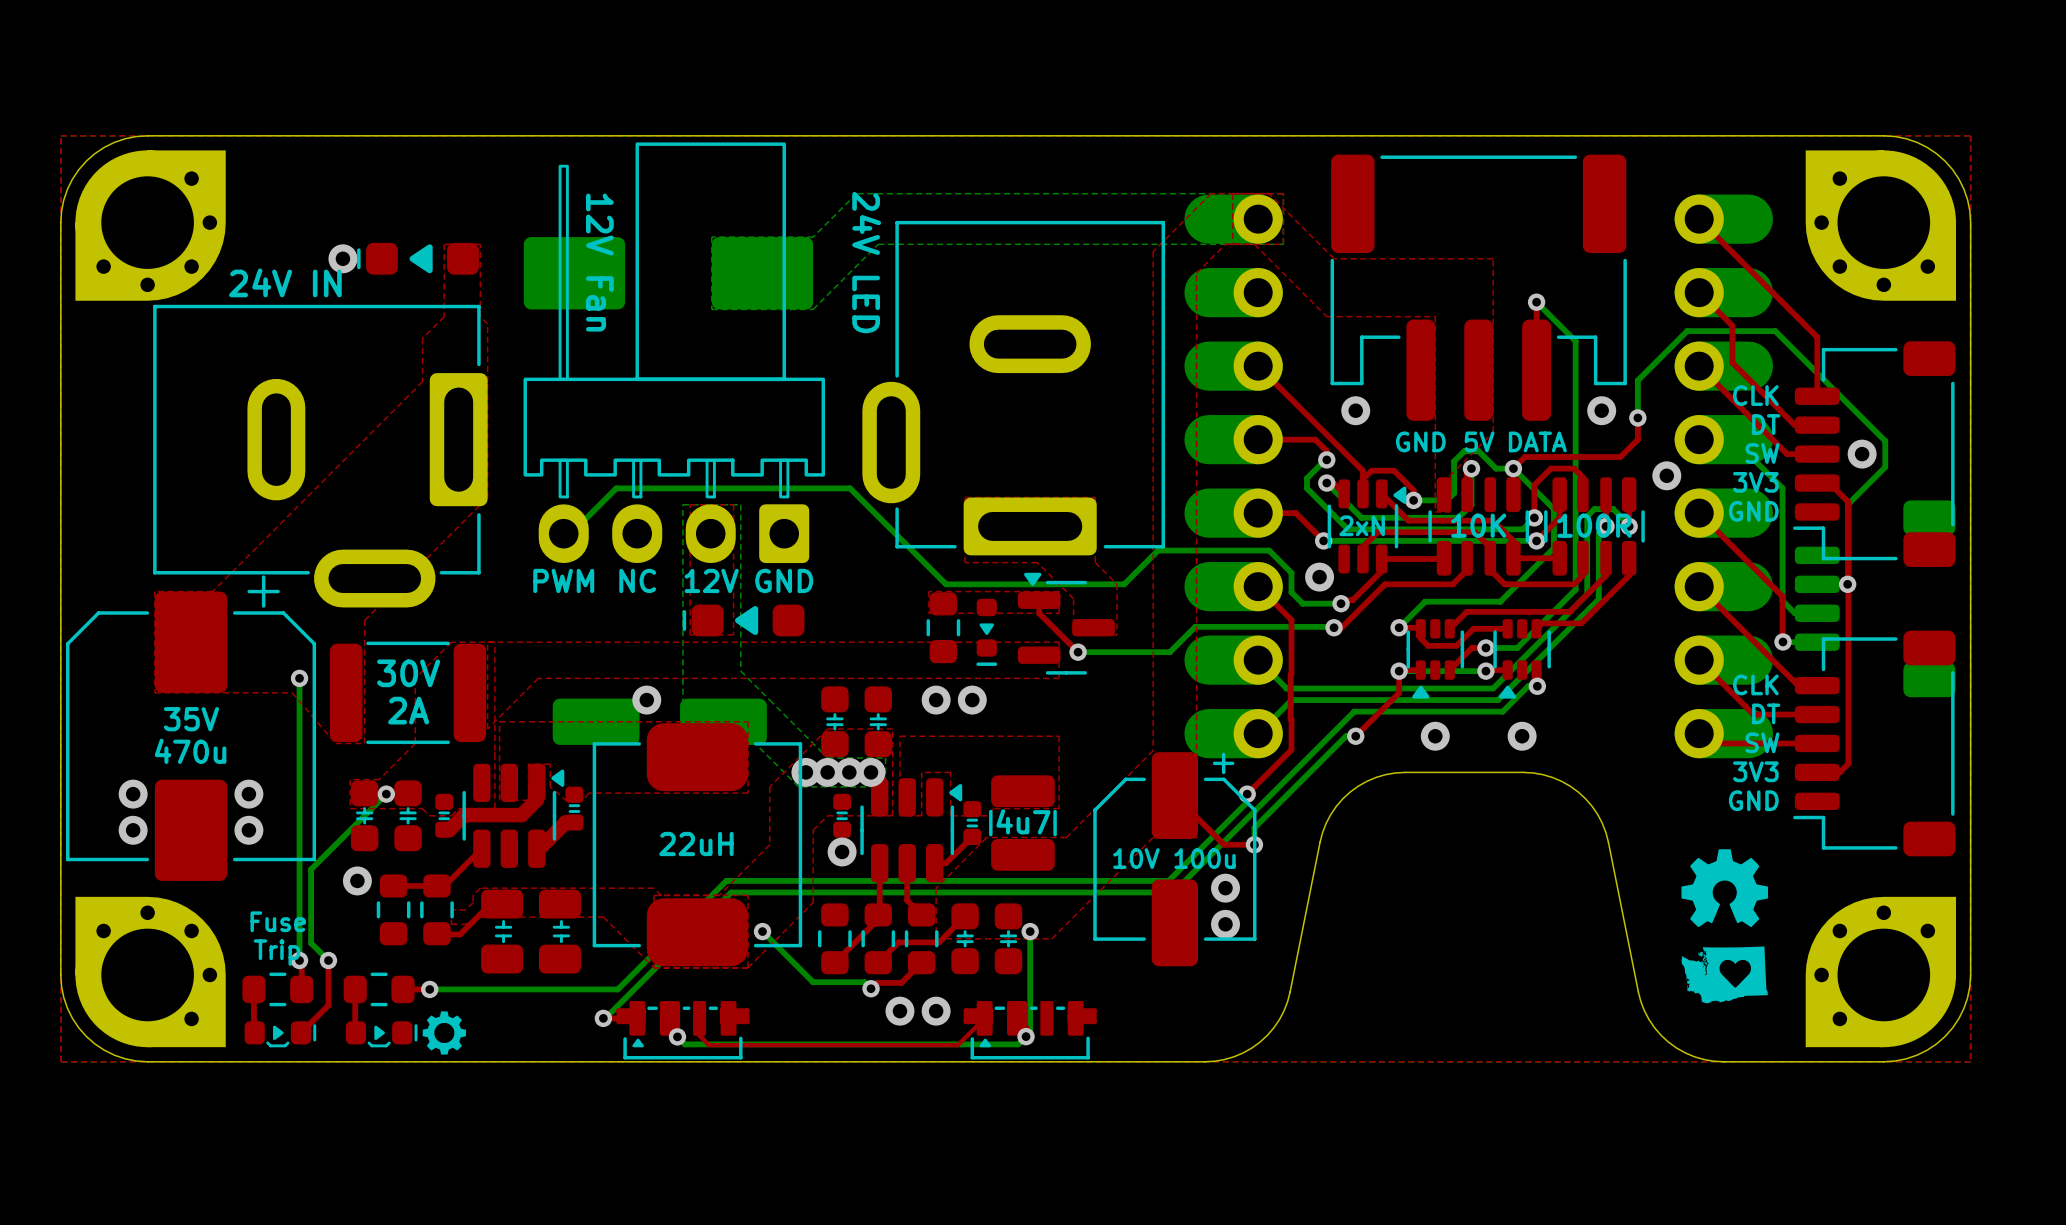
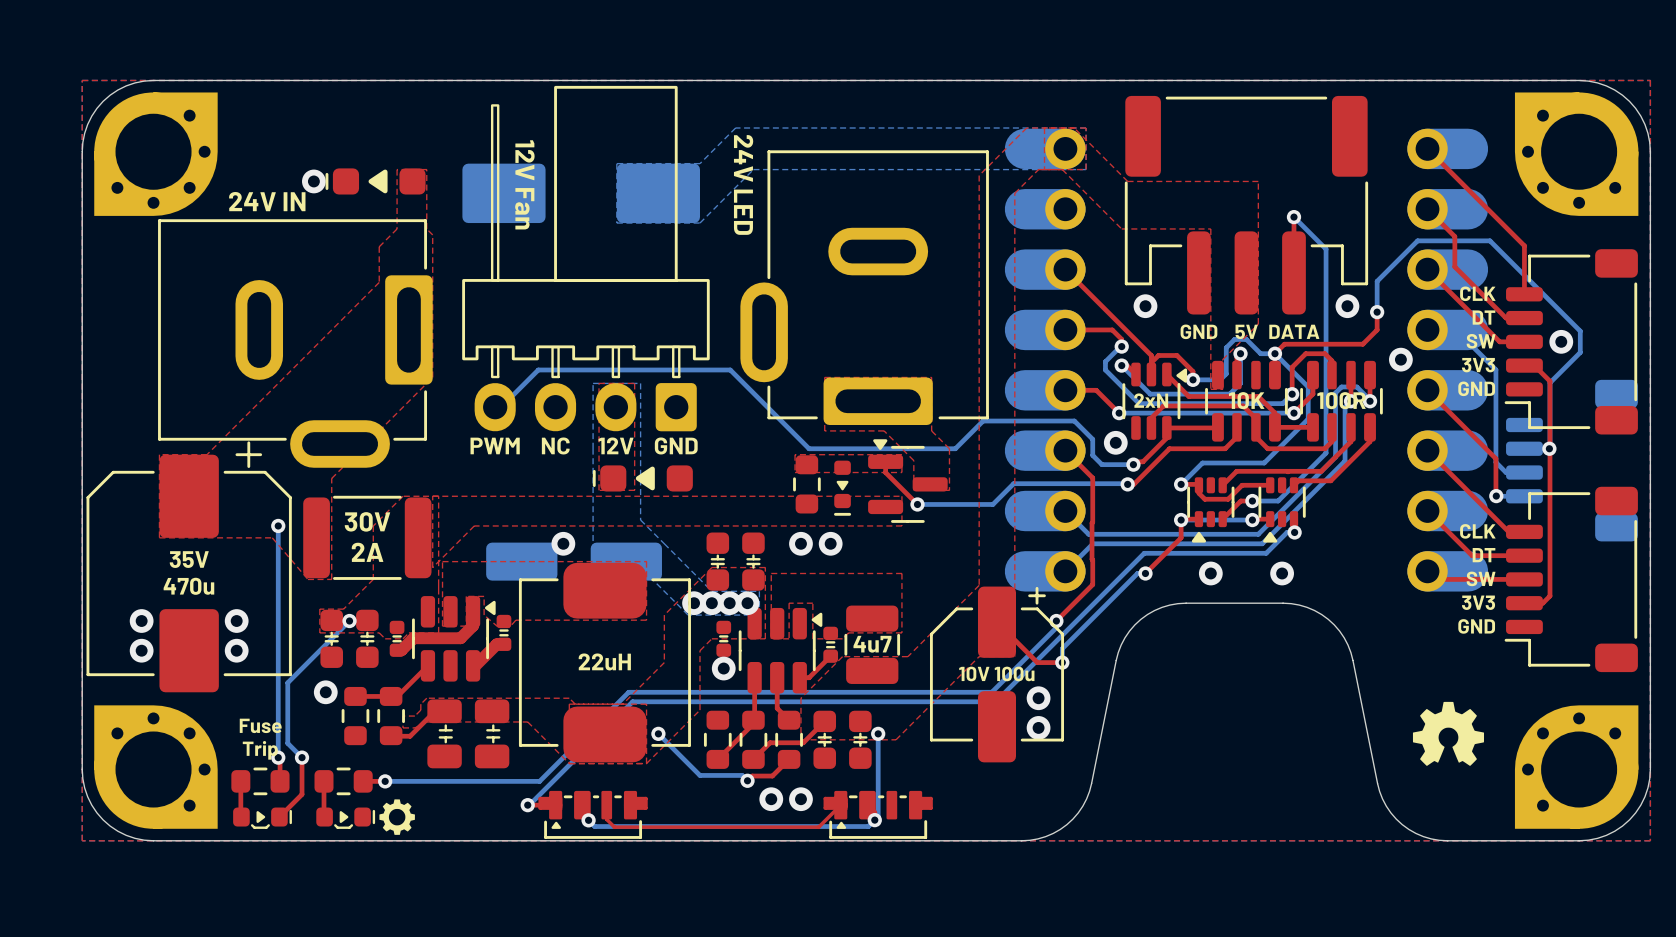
drawing position: (1724, 888) -> (1448, 733)
drawing: [1681, 946, 1769, 1004] -> none

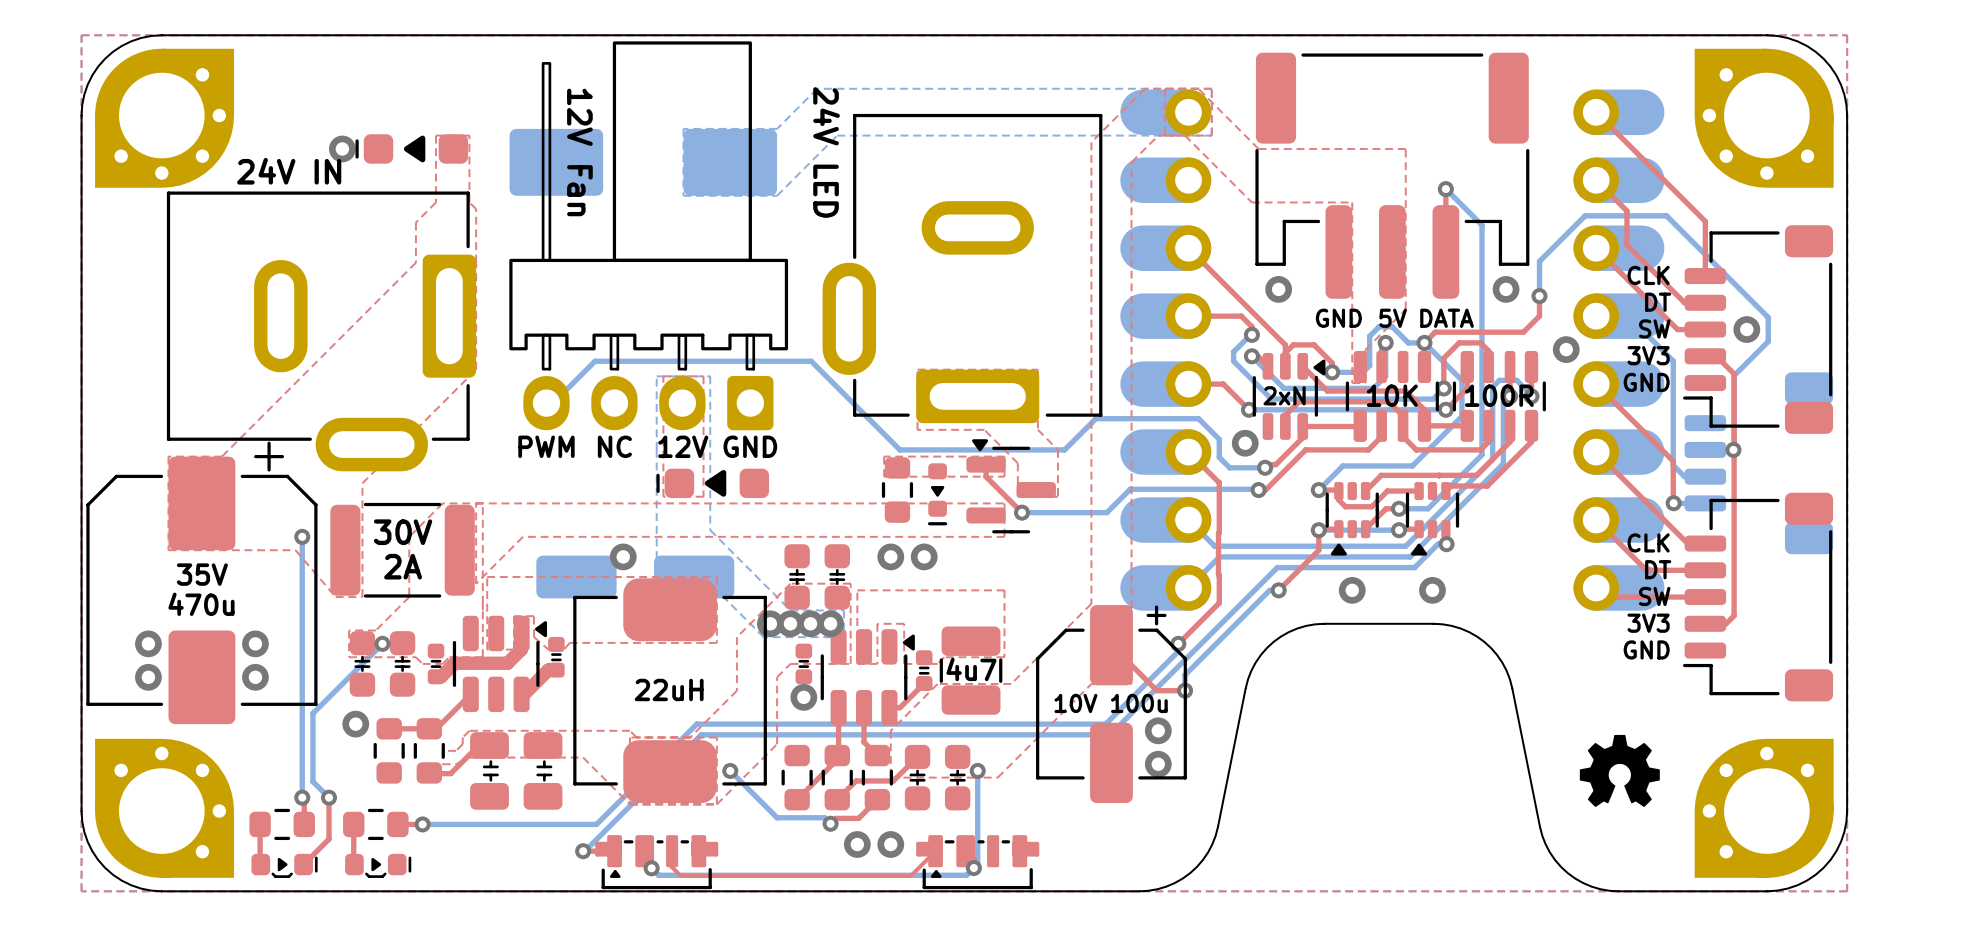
text: Fuse (260, 725) -> none
text: Trip (260, 750) -> none
drawing: [379, 799, 415, 835] -> none

